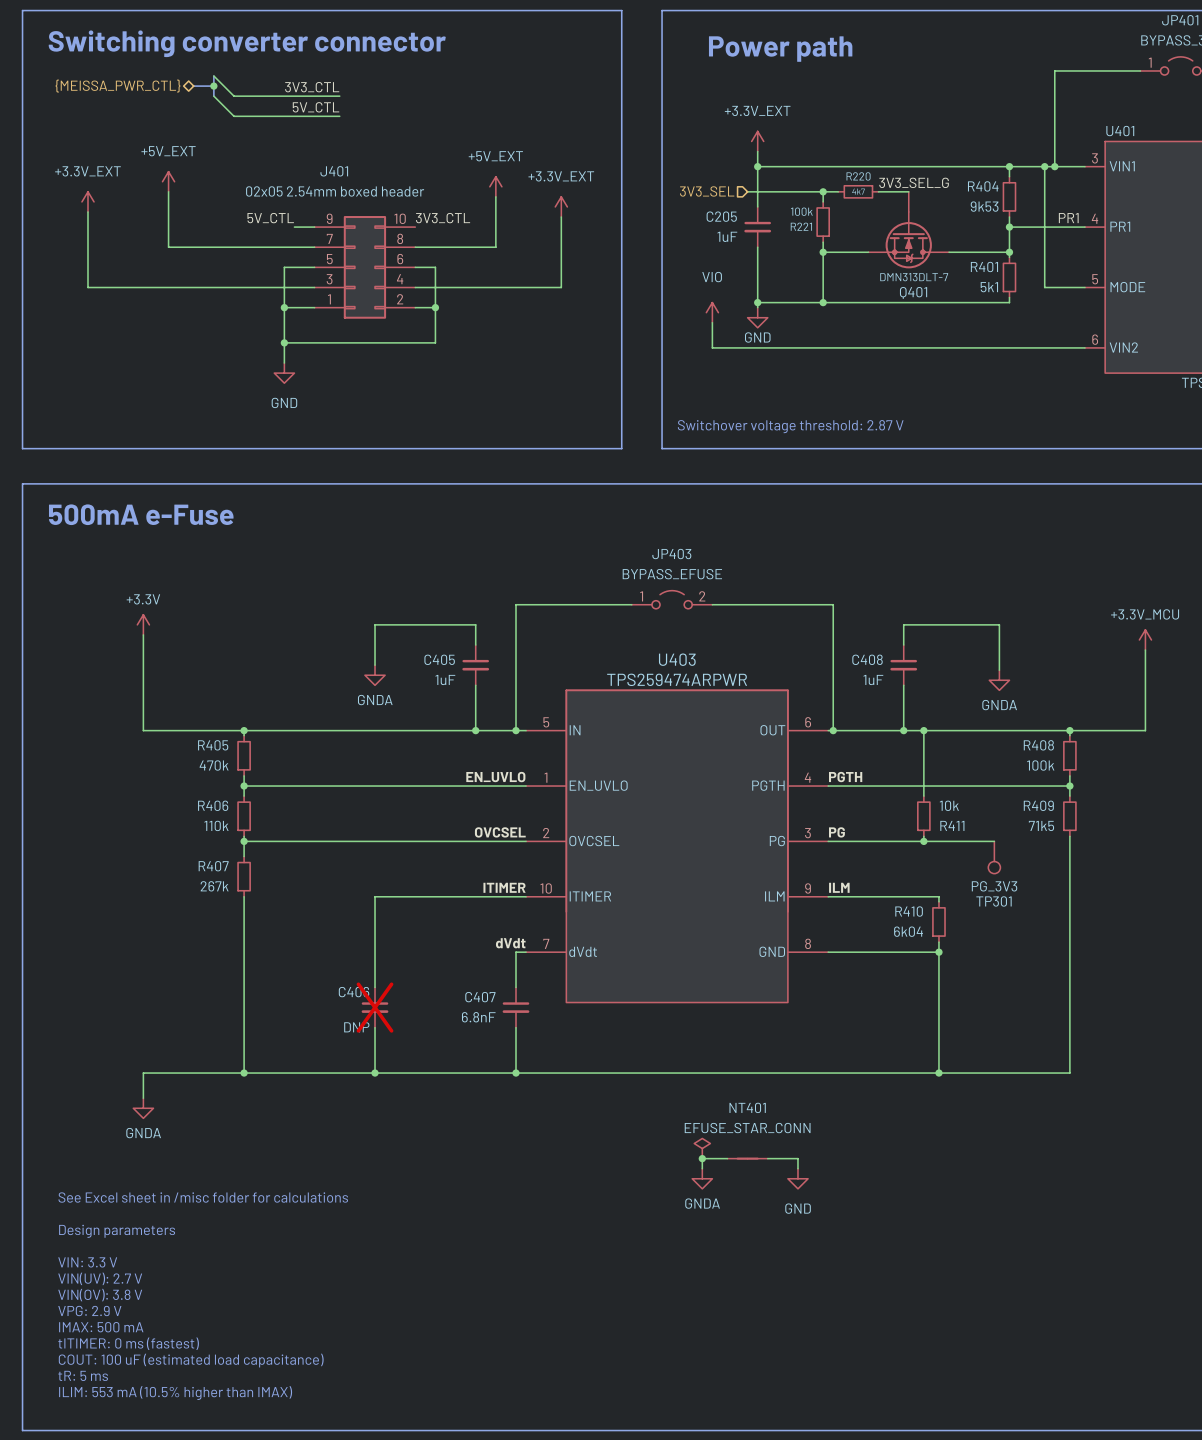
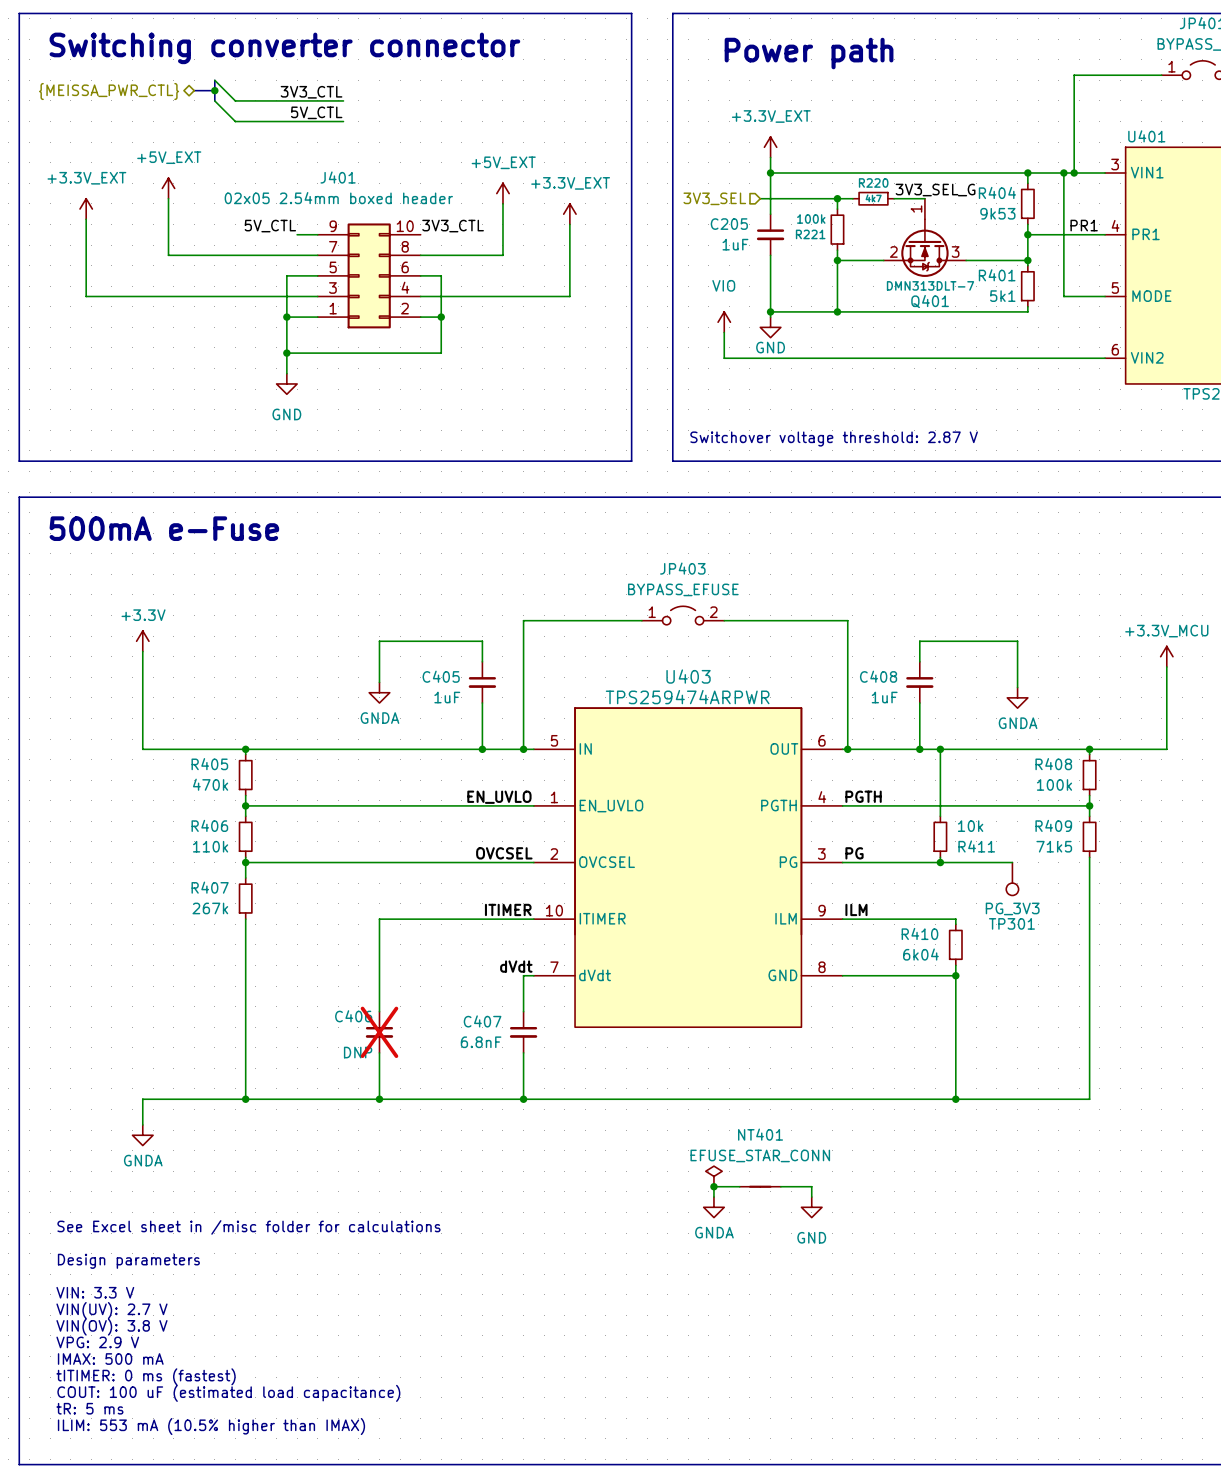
Q401 pin number: none -> 1 (916, 209)
Q401 pin number: none -> 2 (893, 251)
Q401 pin number: none -> 3 (955, 251)

